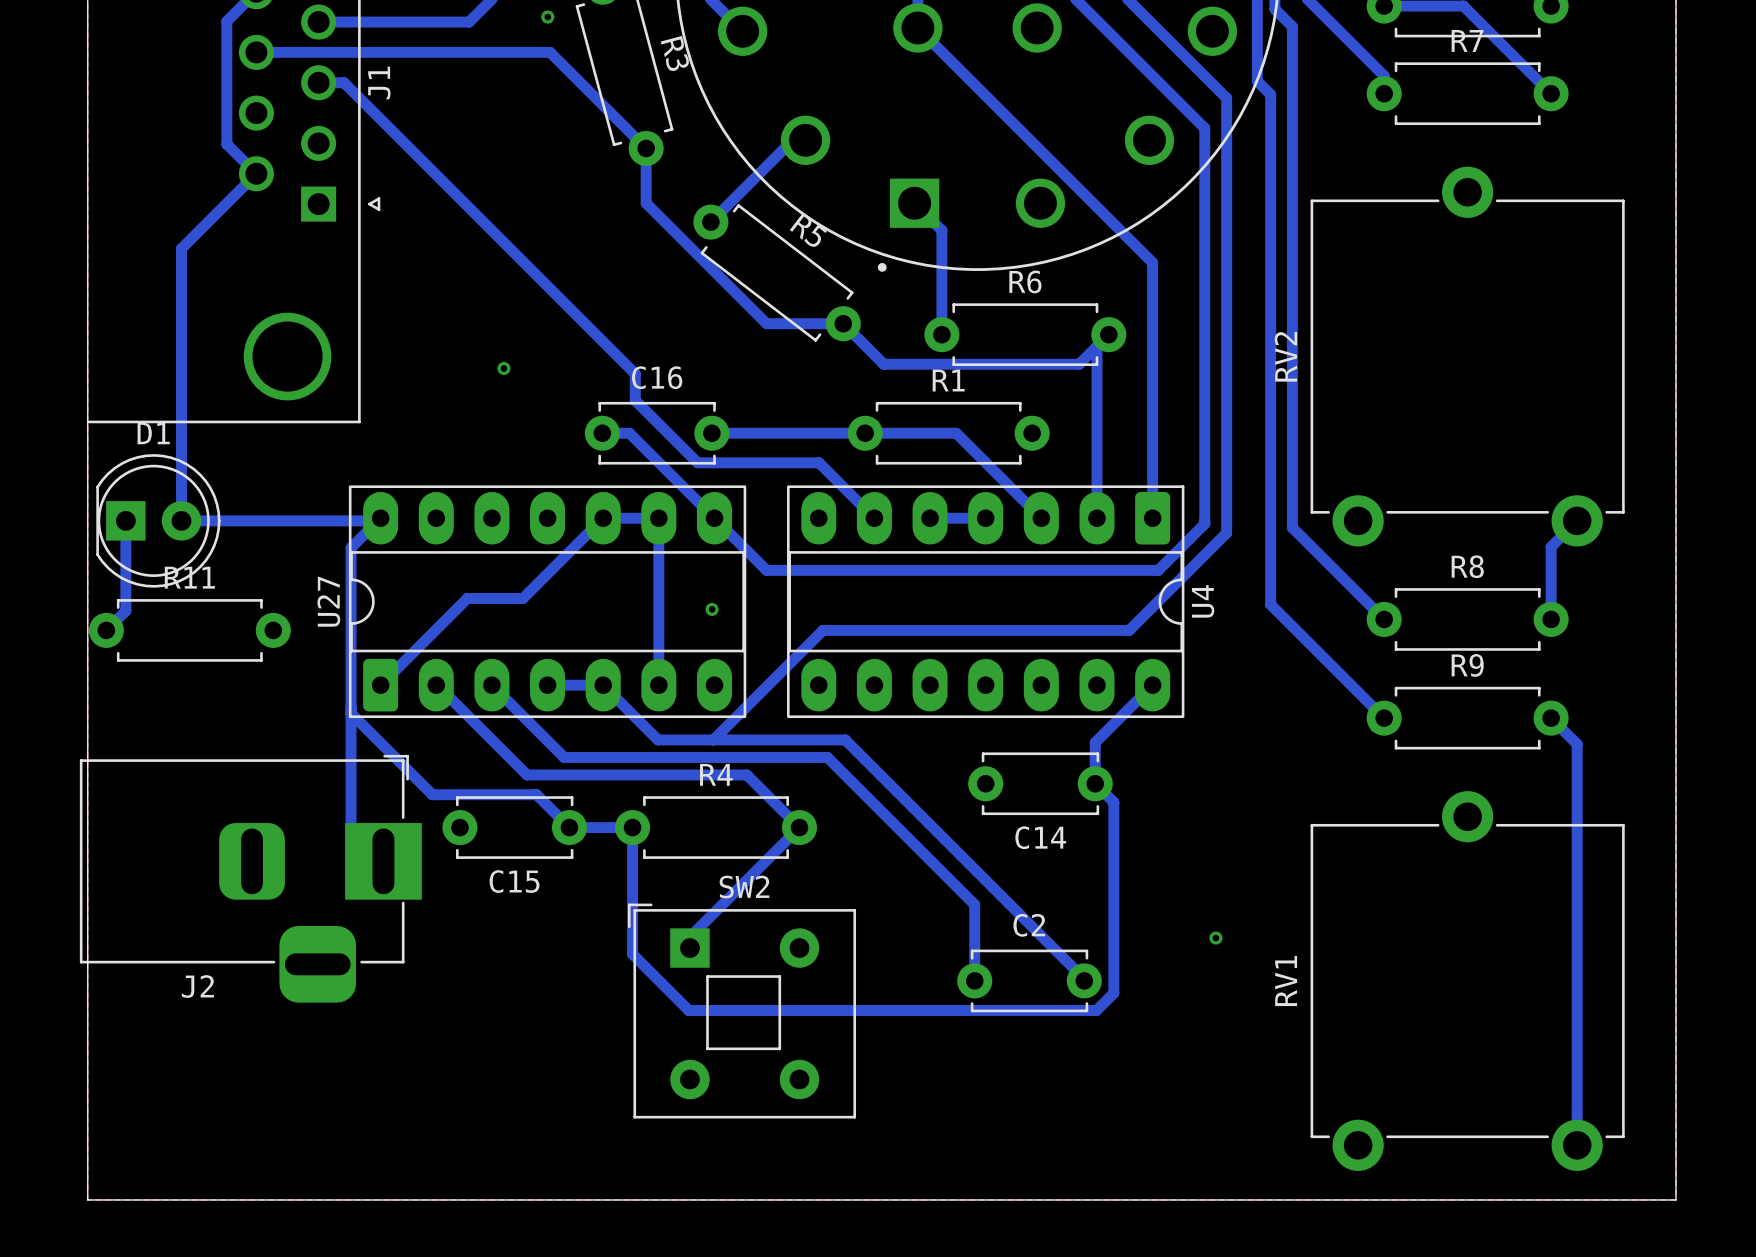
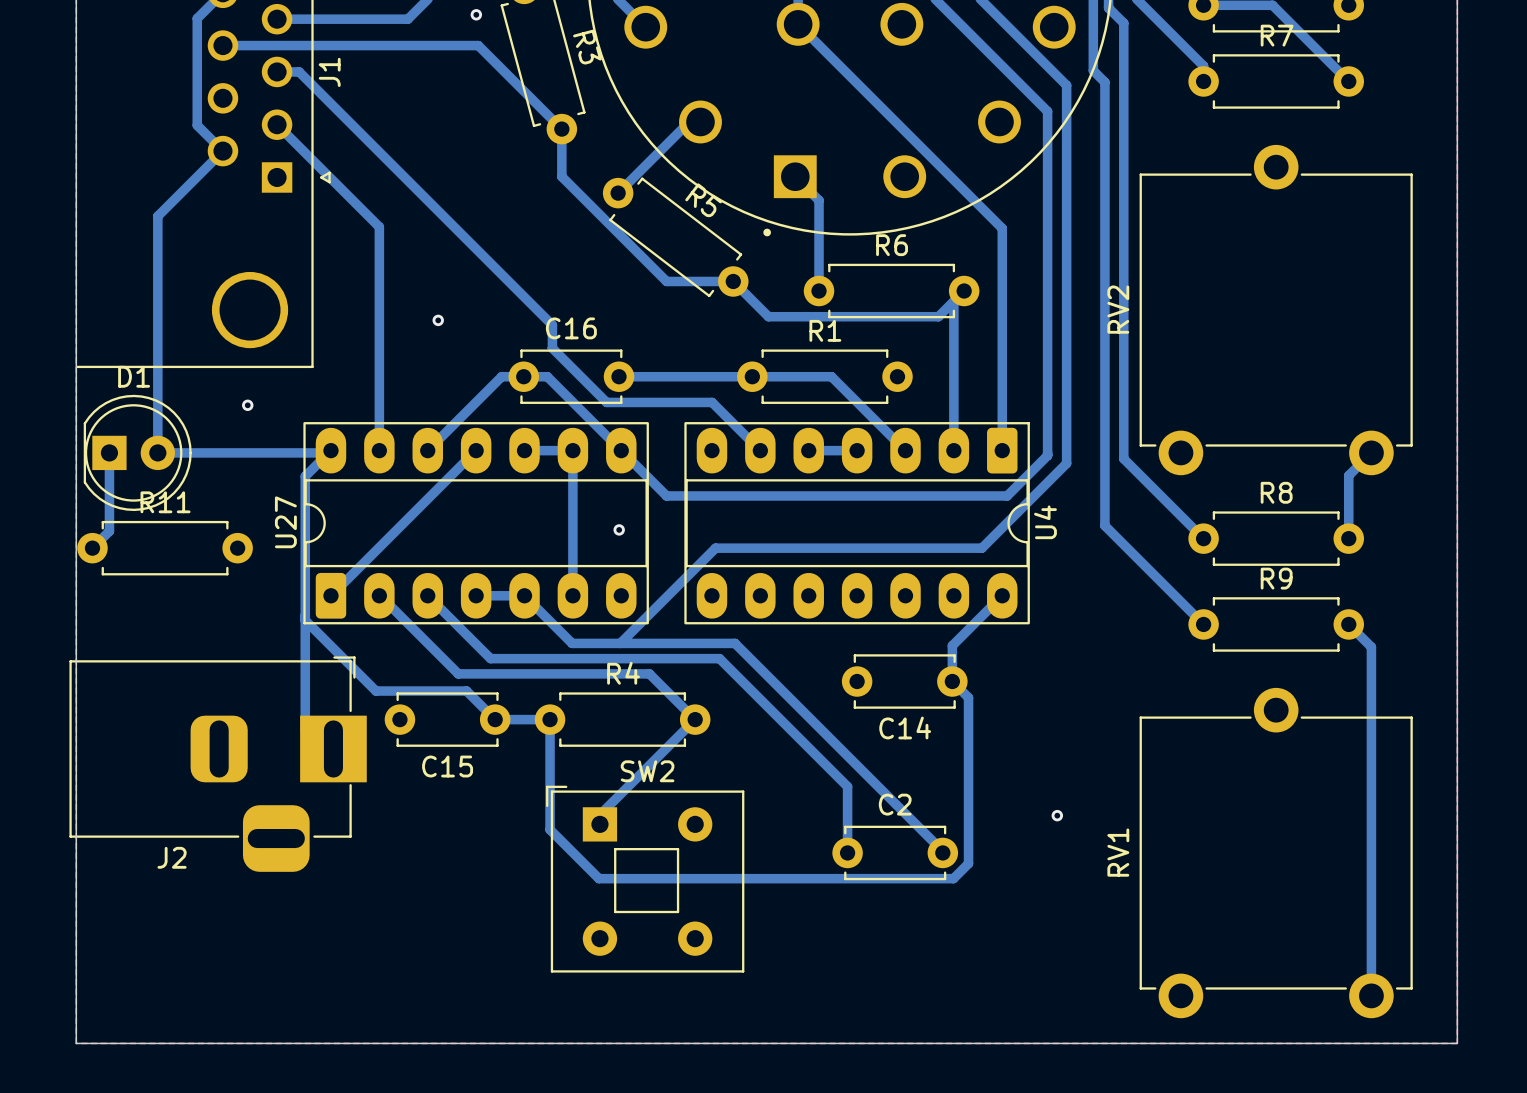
bottom track: none -> (277, 124) (379, 227) (379, 450)
bottom track: none -> (523, 376) (501, 376) (427, 450)
via: none -> (247, 405)
bottom track: (603, 518) (522, 598) (467, 598) -> (476, 450) (406, 520)

